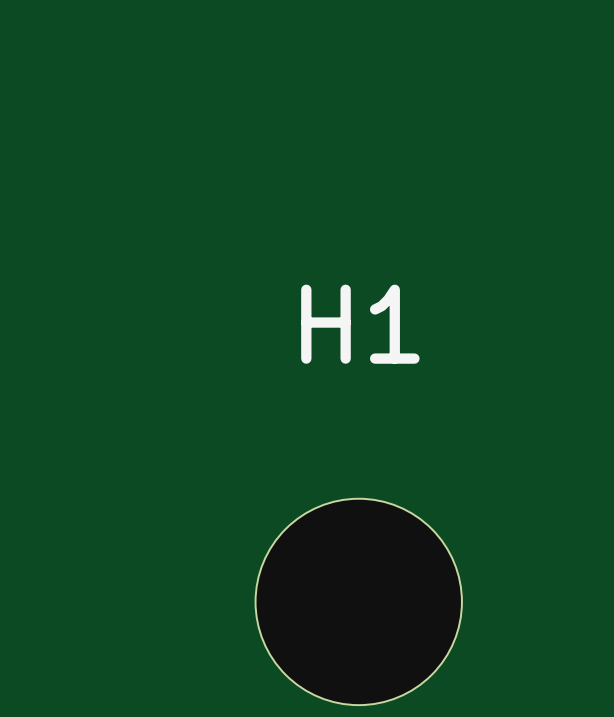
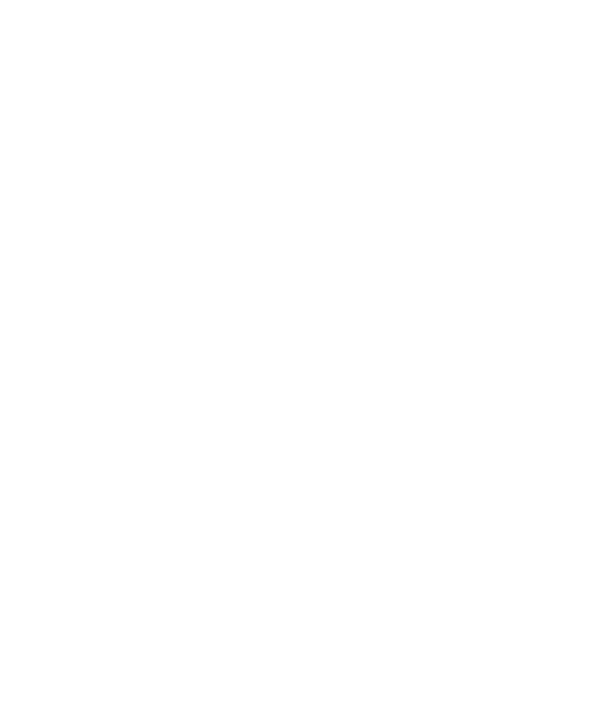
H1: (358, 601) -> none

